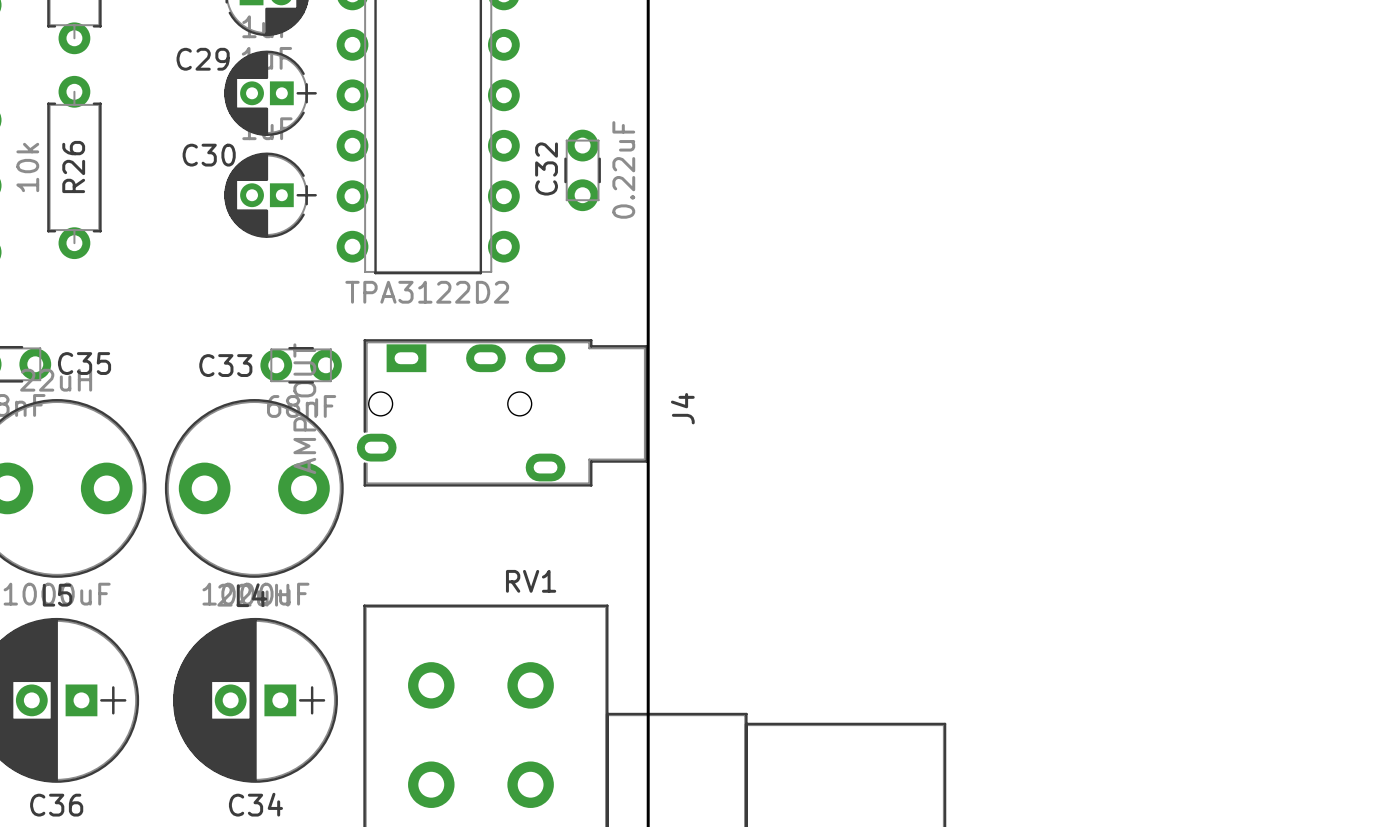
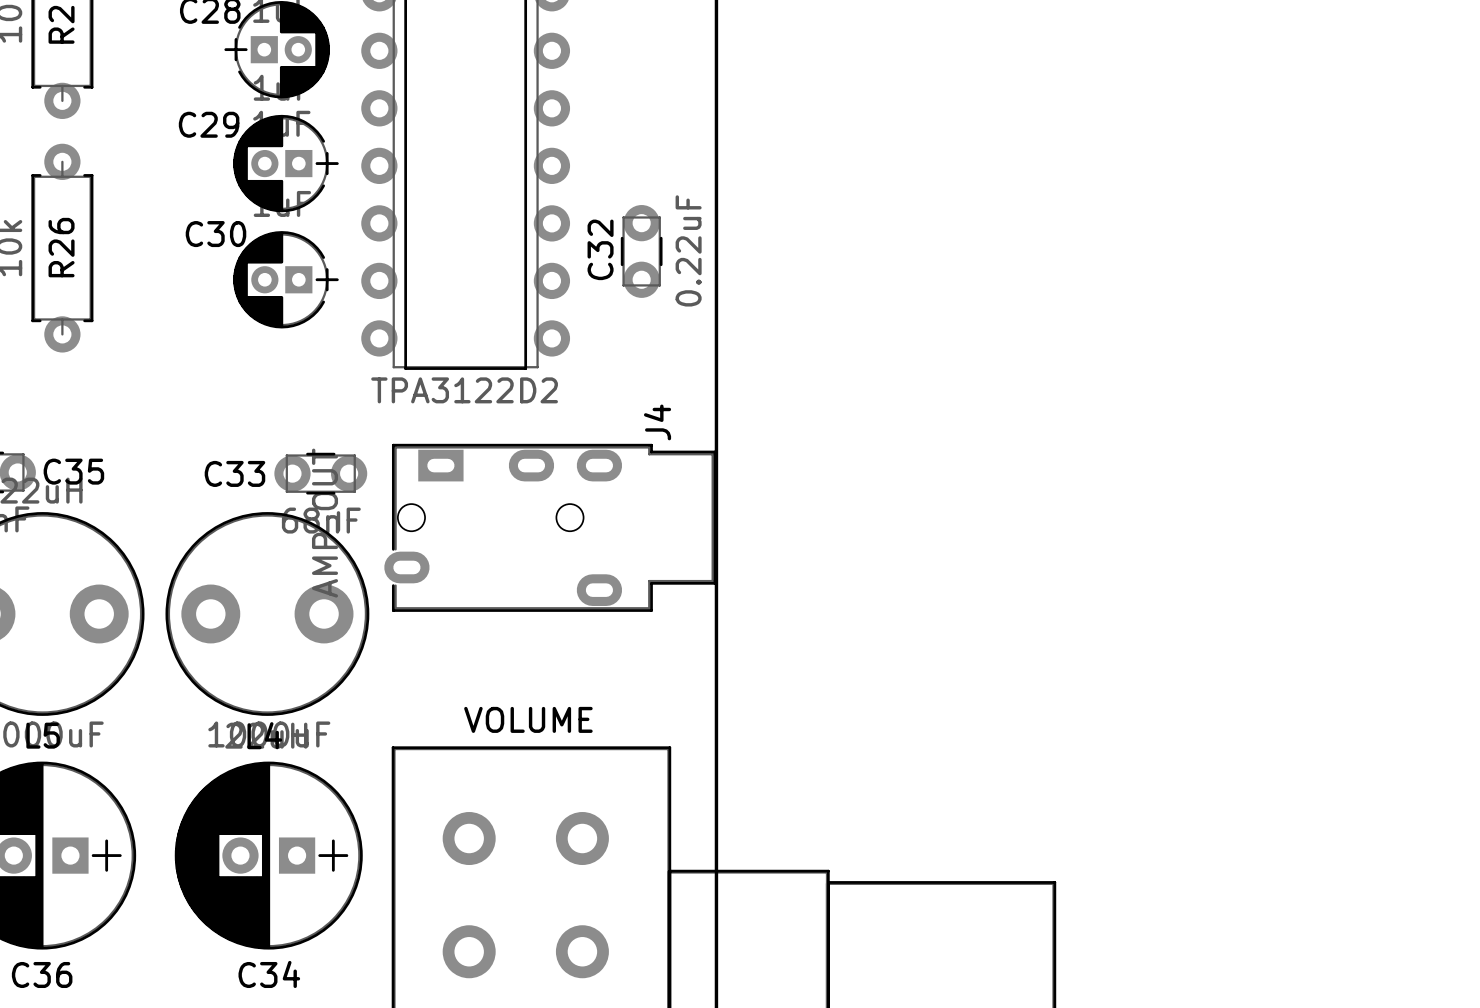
J4 name position: J4 (682, 408) -> J4 (657, 422)
RV1 name: RV1 (531, 581) -> VOLUME (528, 719)

